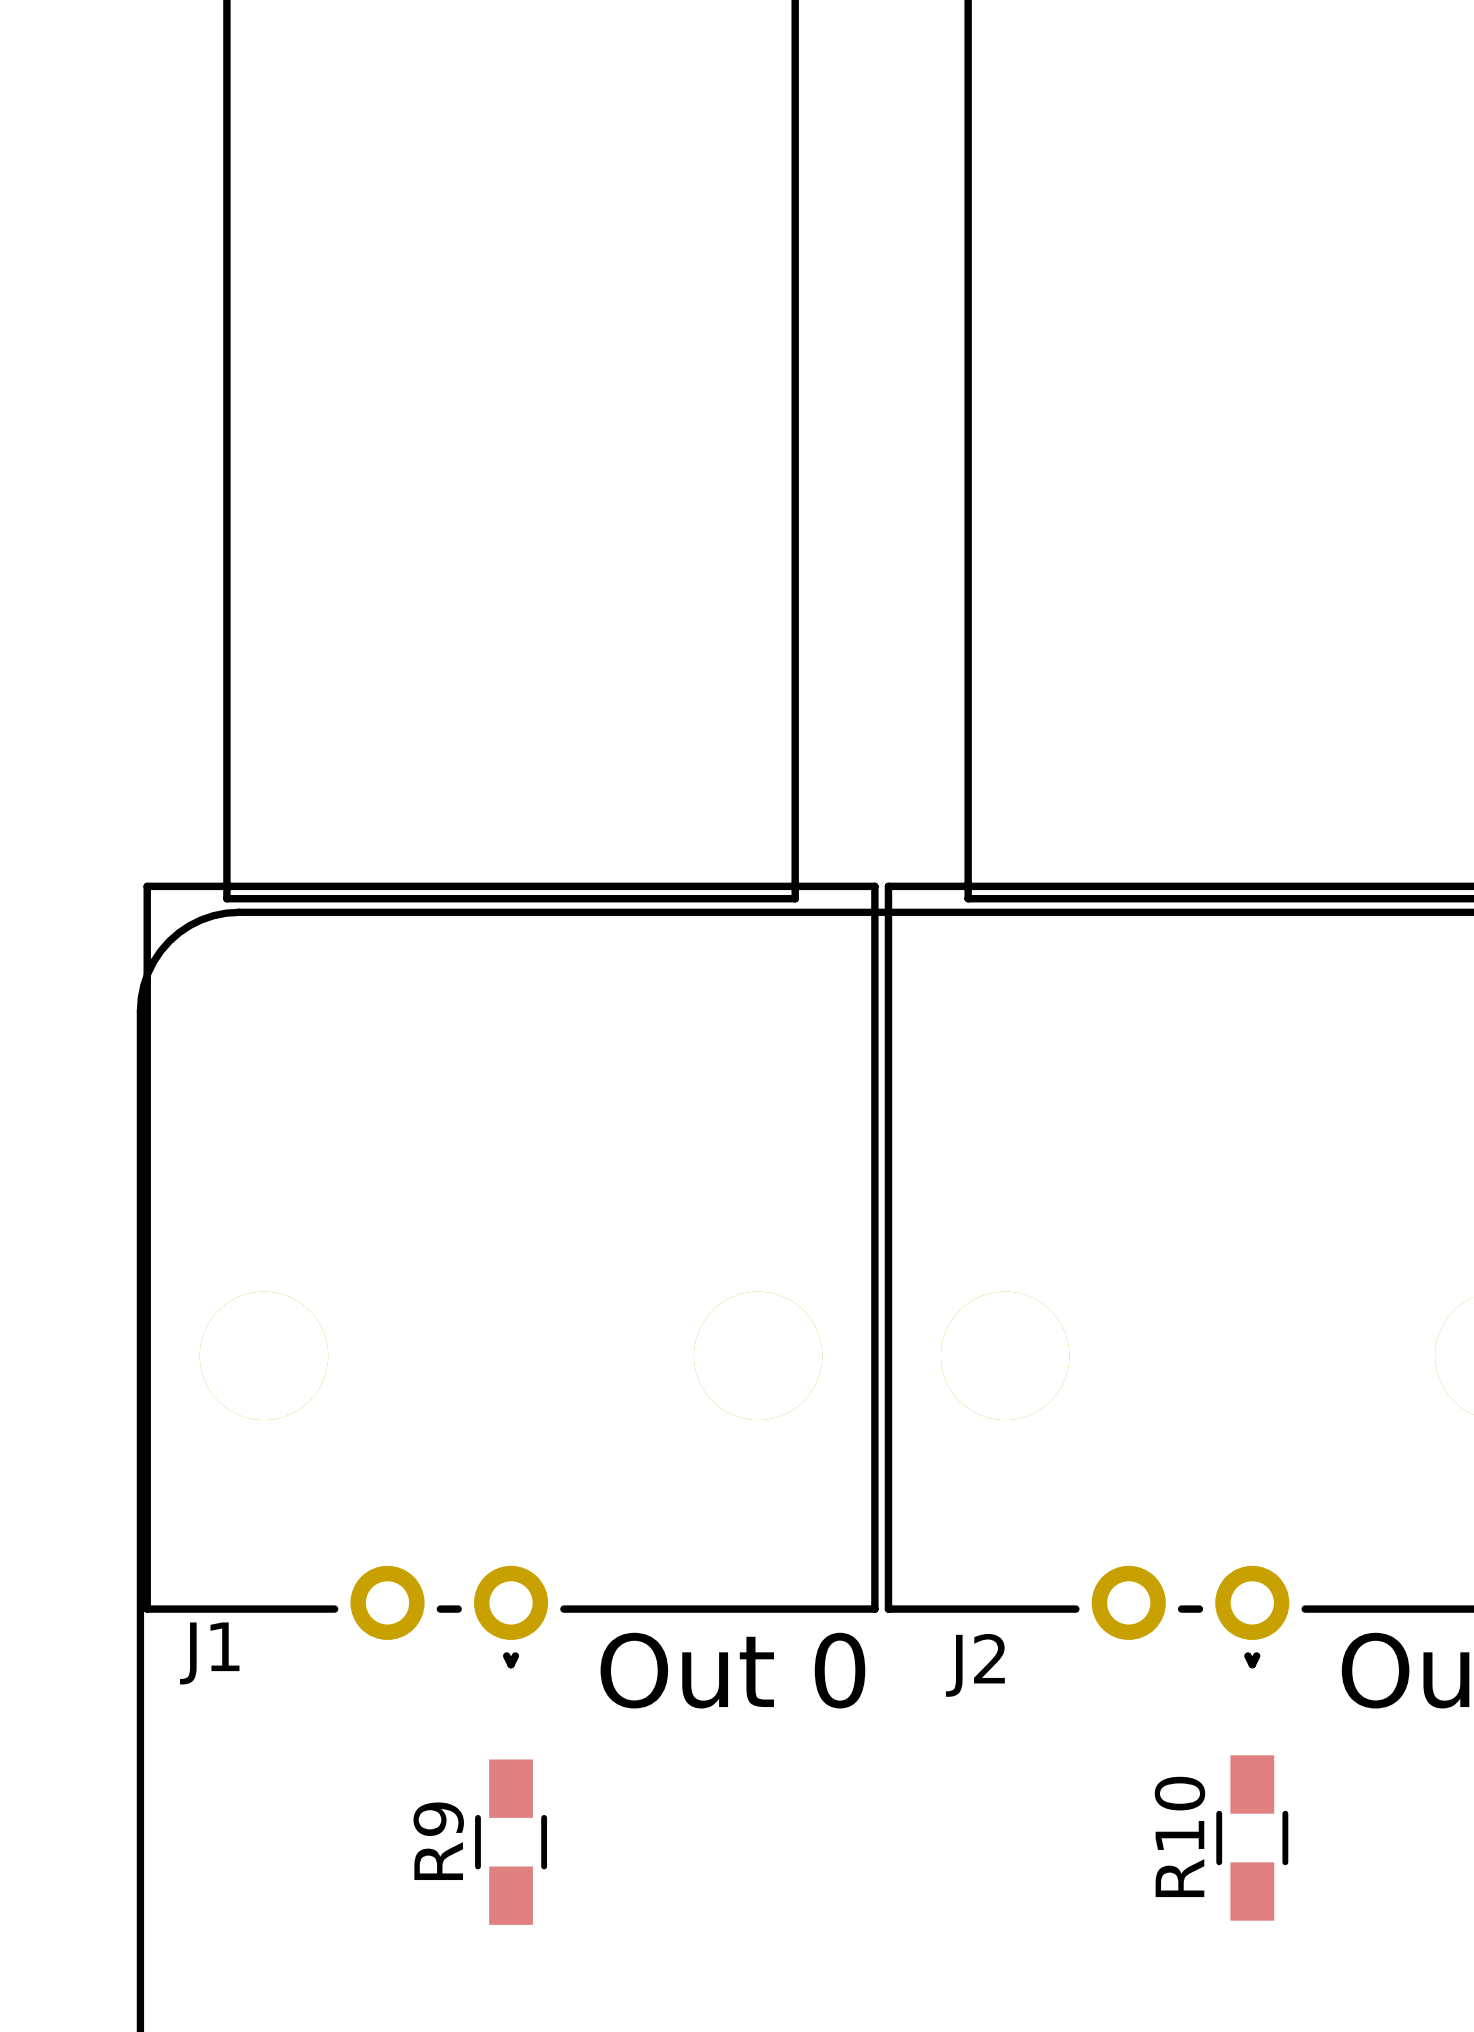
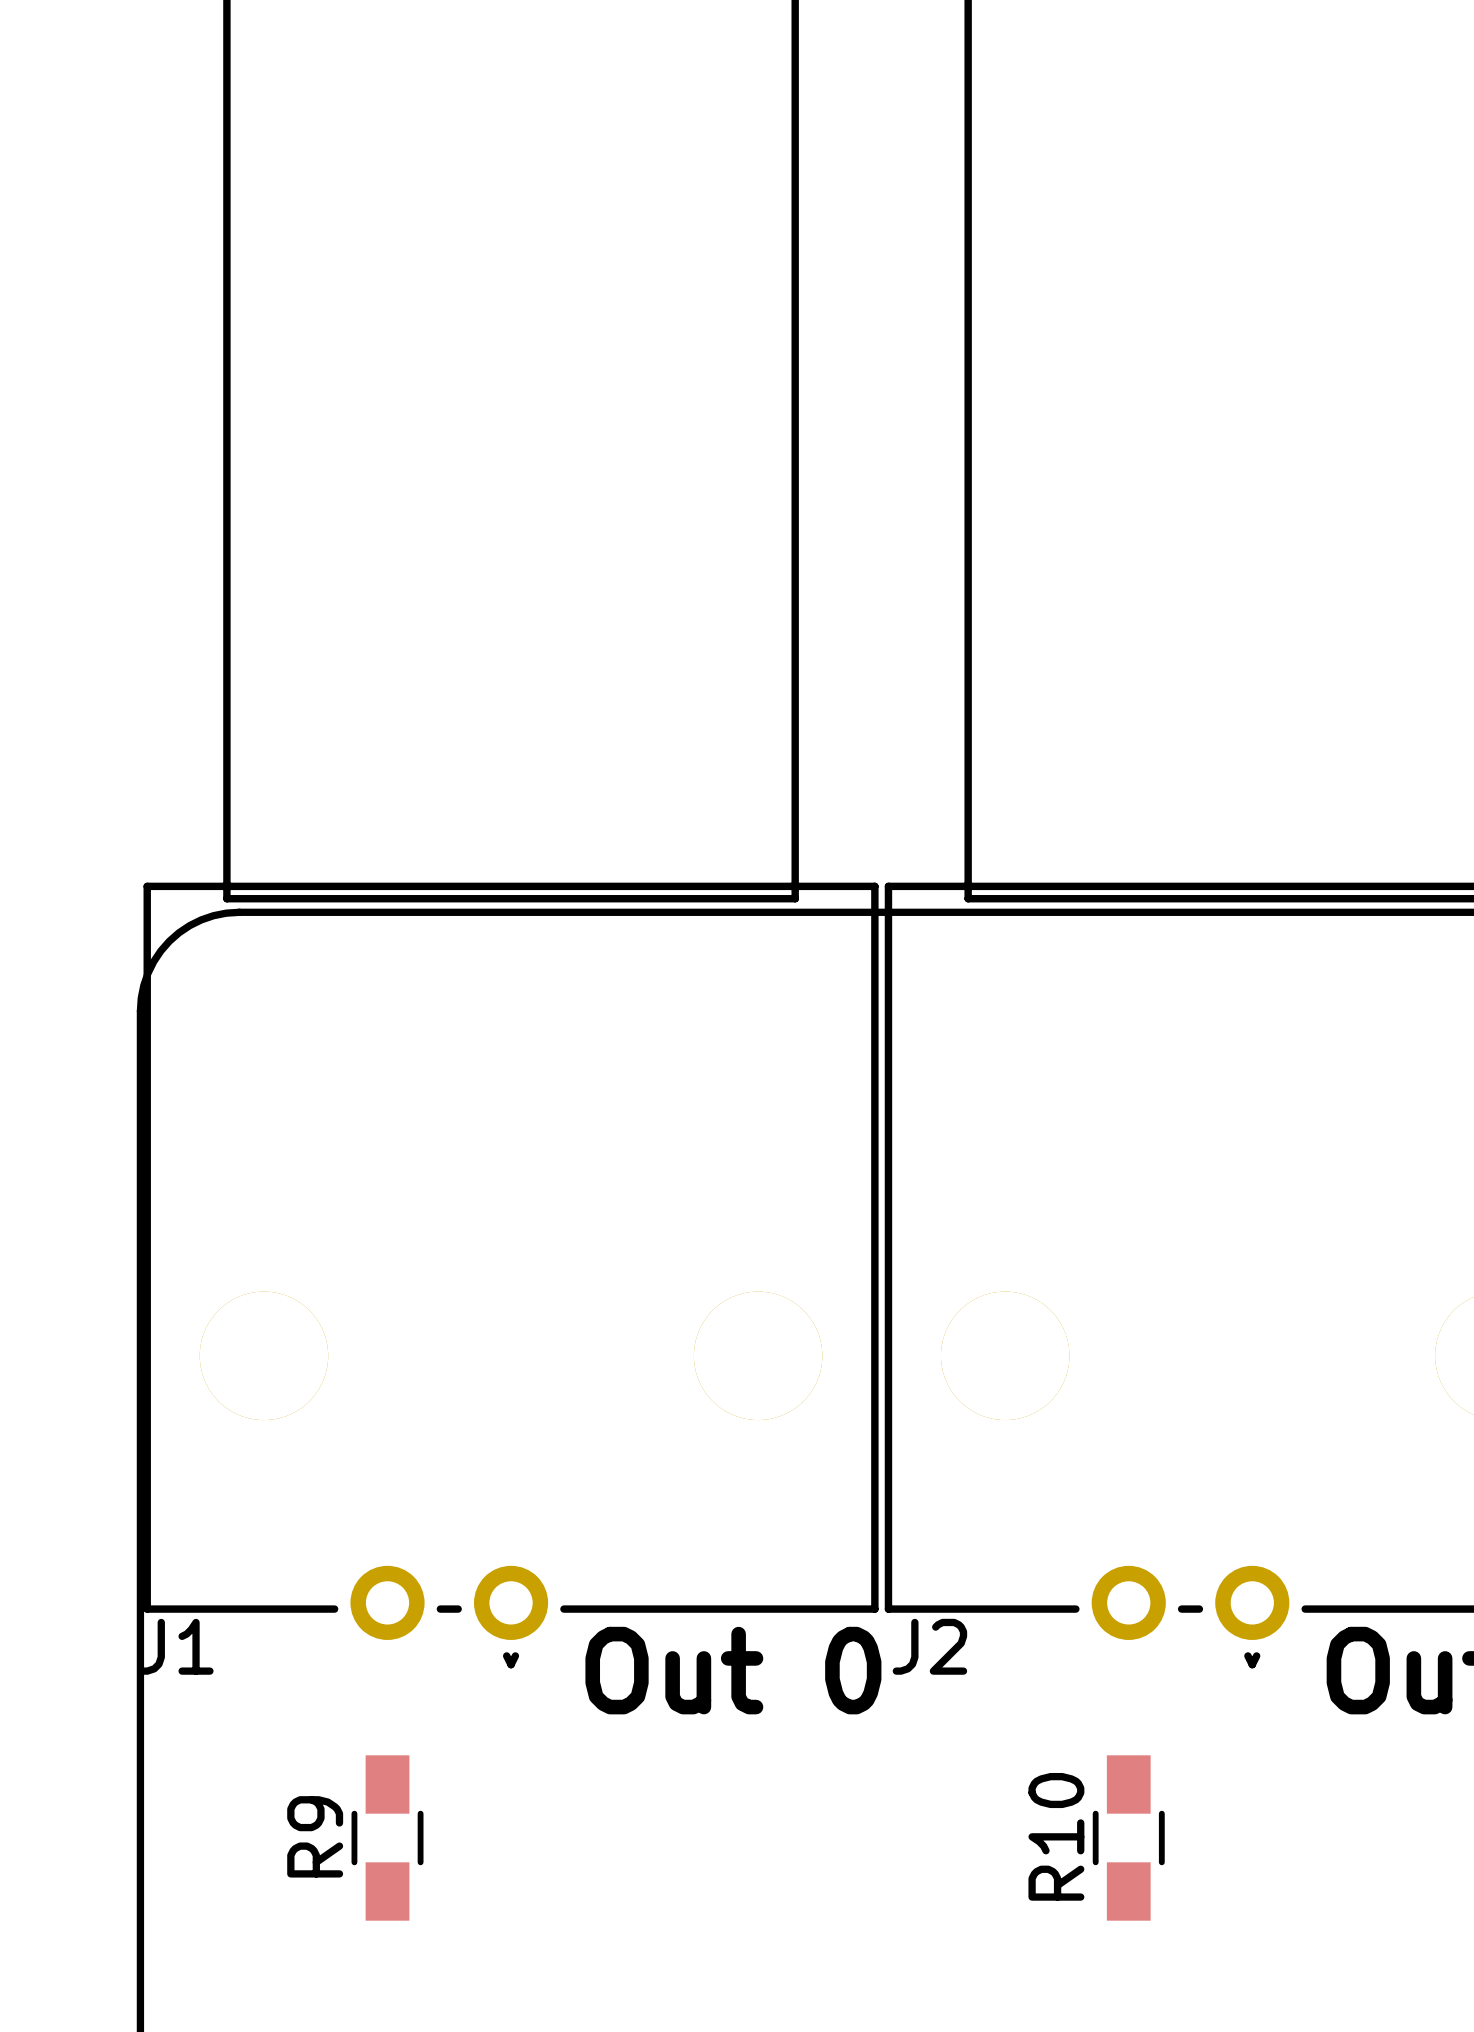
J1 name position: J1 (209, 1653) -> J1 (176, 1646)
J2 name position: J2 (975, 1665) -> J2 (929, 1646)
R10 position: (1252, 1838) -> (1128, 1838)
R9 position: (511, 1842) -> (387, 1838)

